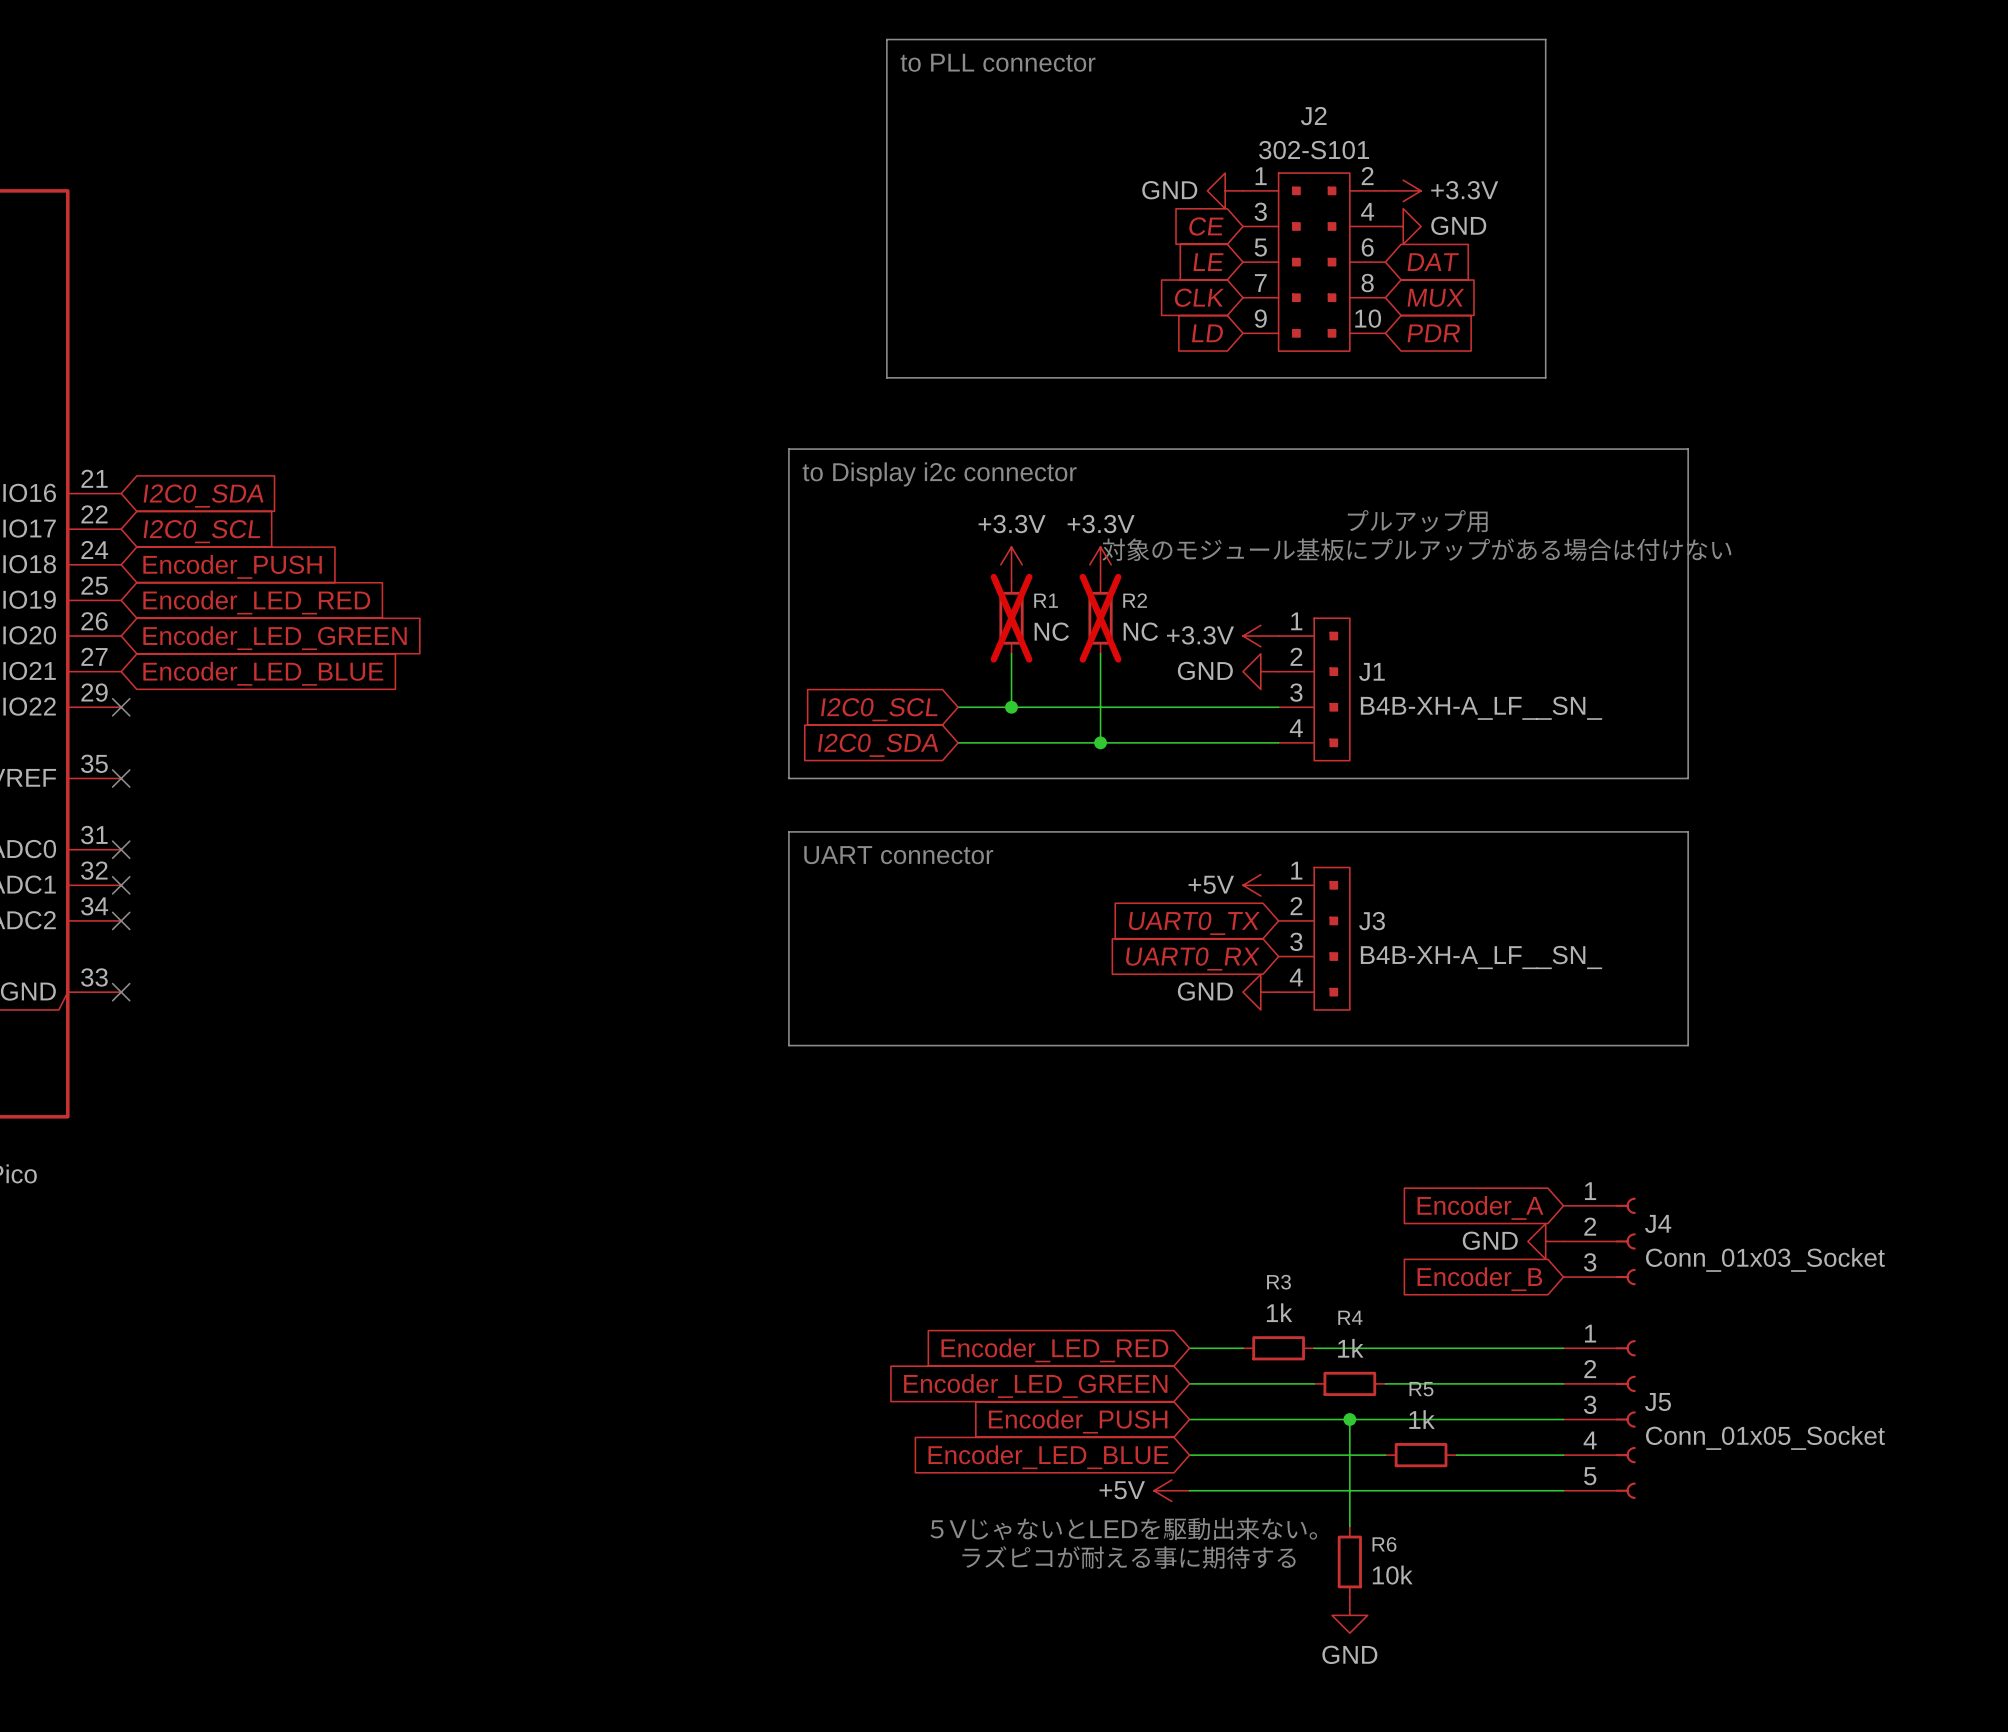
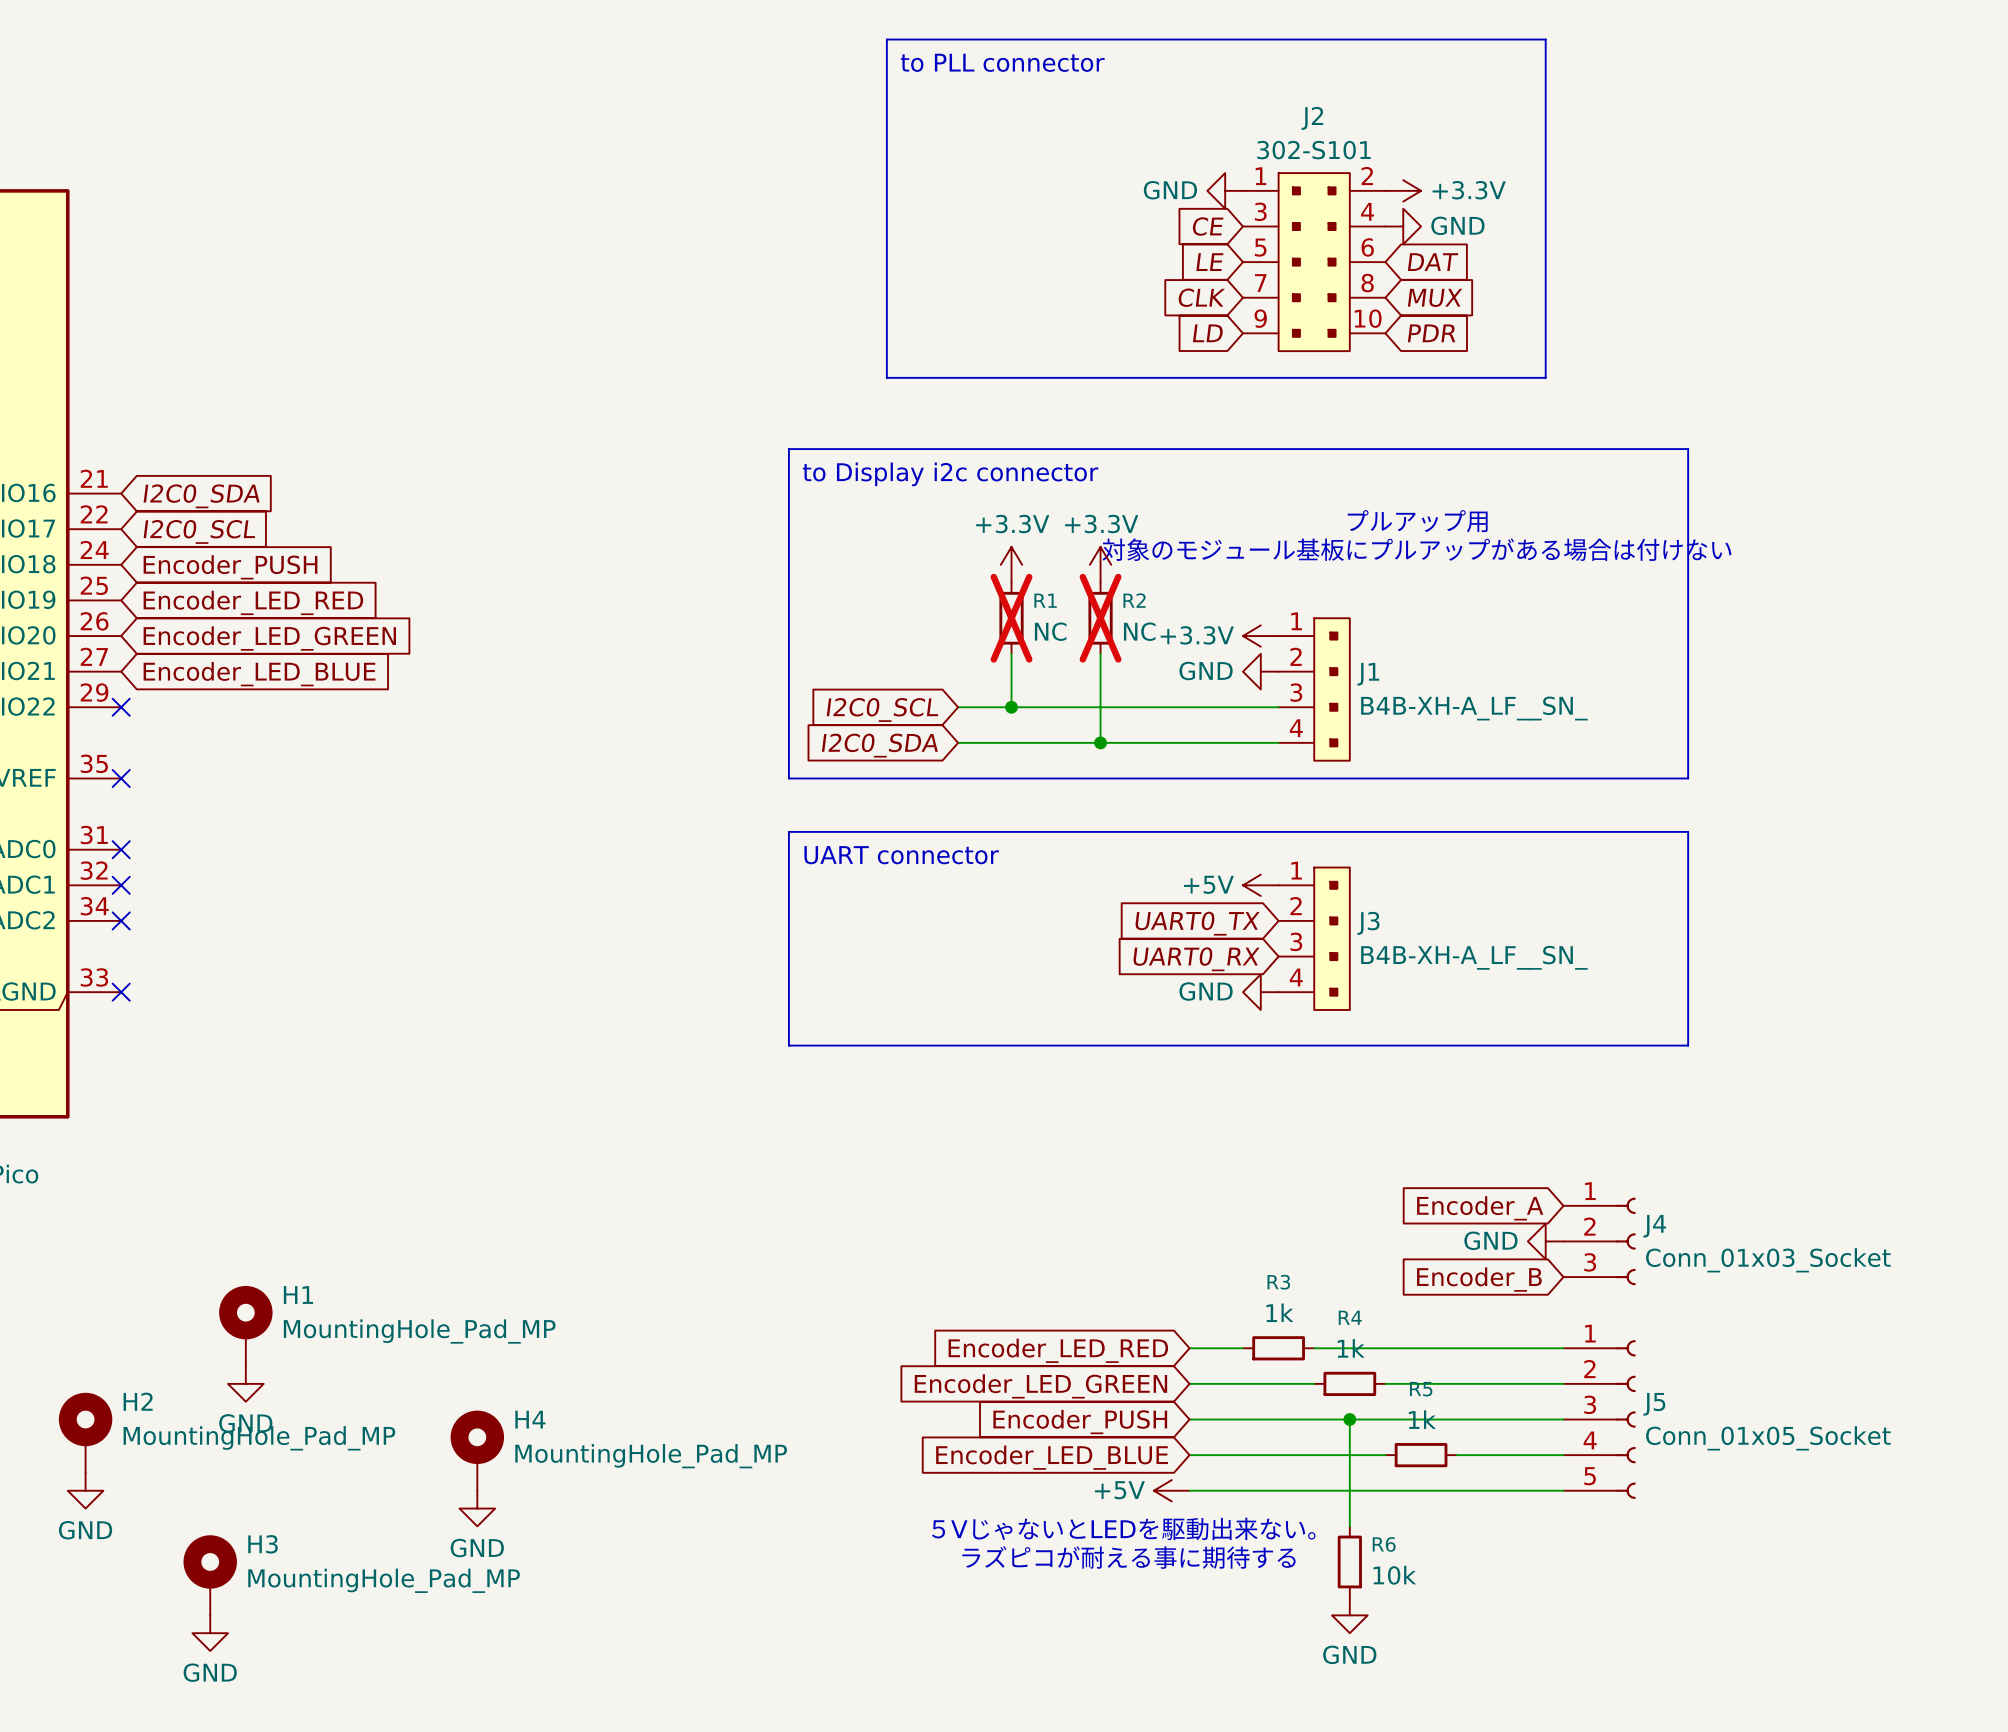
H1: none -> MountingHole_Pad_MP (245, 1326)
power symbol: none -> GND (245, 1383)
H2: none -> MountingHole_Pad_MP (85, 1432)
H4: none -> MountingHole_Pad_MP (477, 1450)
power symbol: none -> GND (85, 1490)
power symbol: none -> GND (477, 1508)
H3: none -> MountingHole_Pad_MP (210, 1575)
power symbol: none -> GND (210, 1633)

